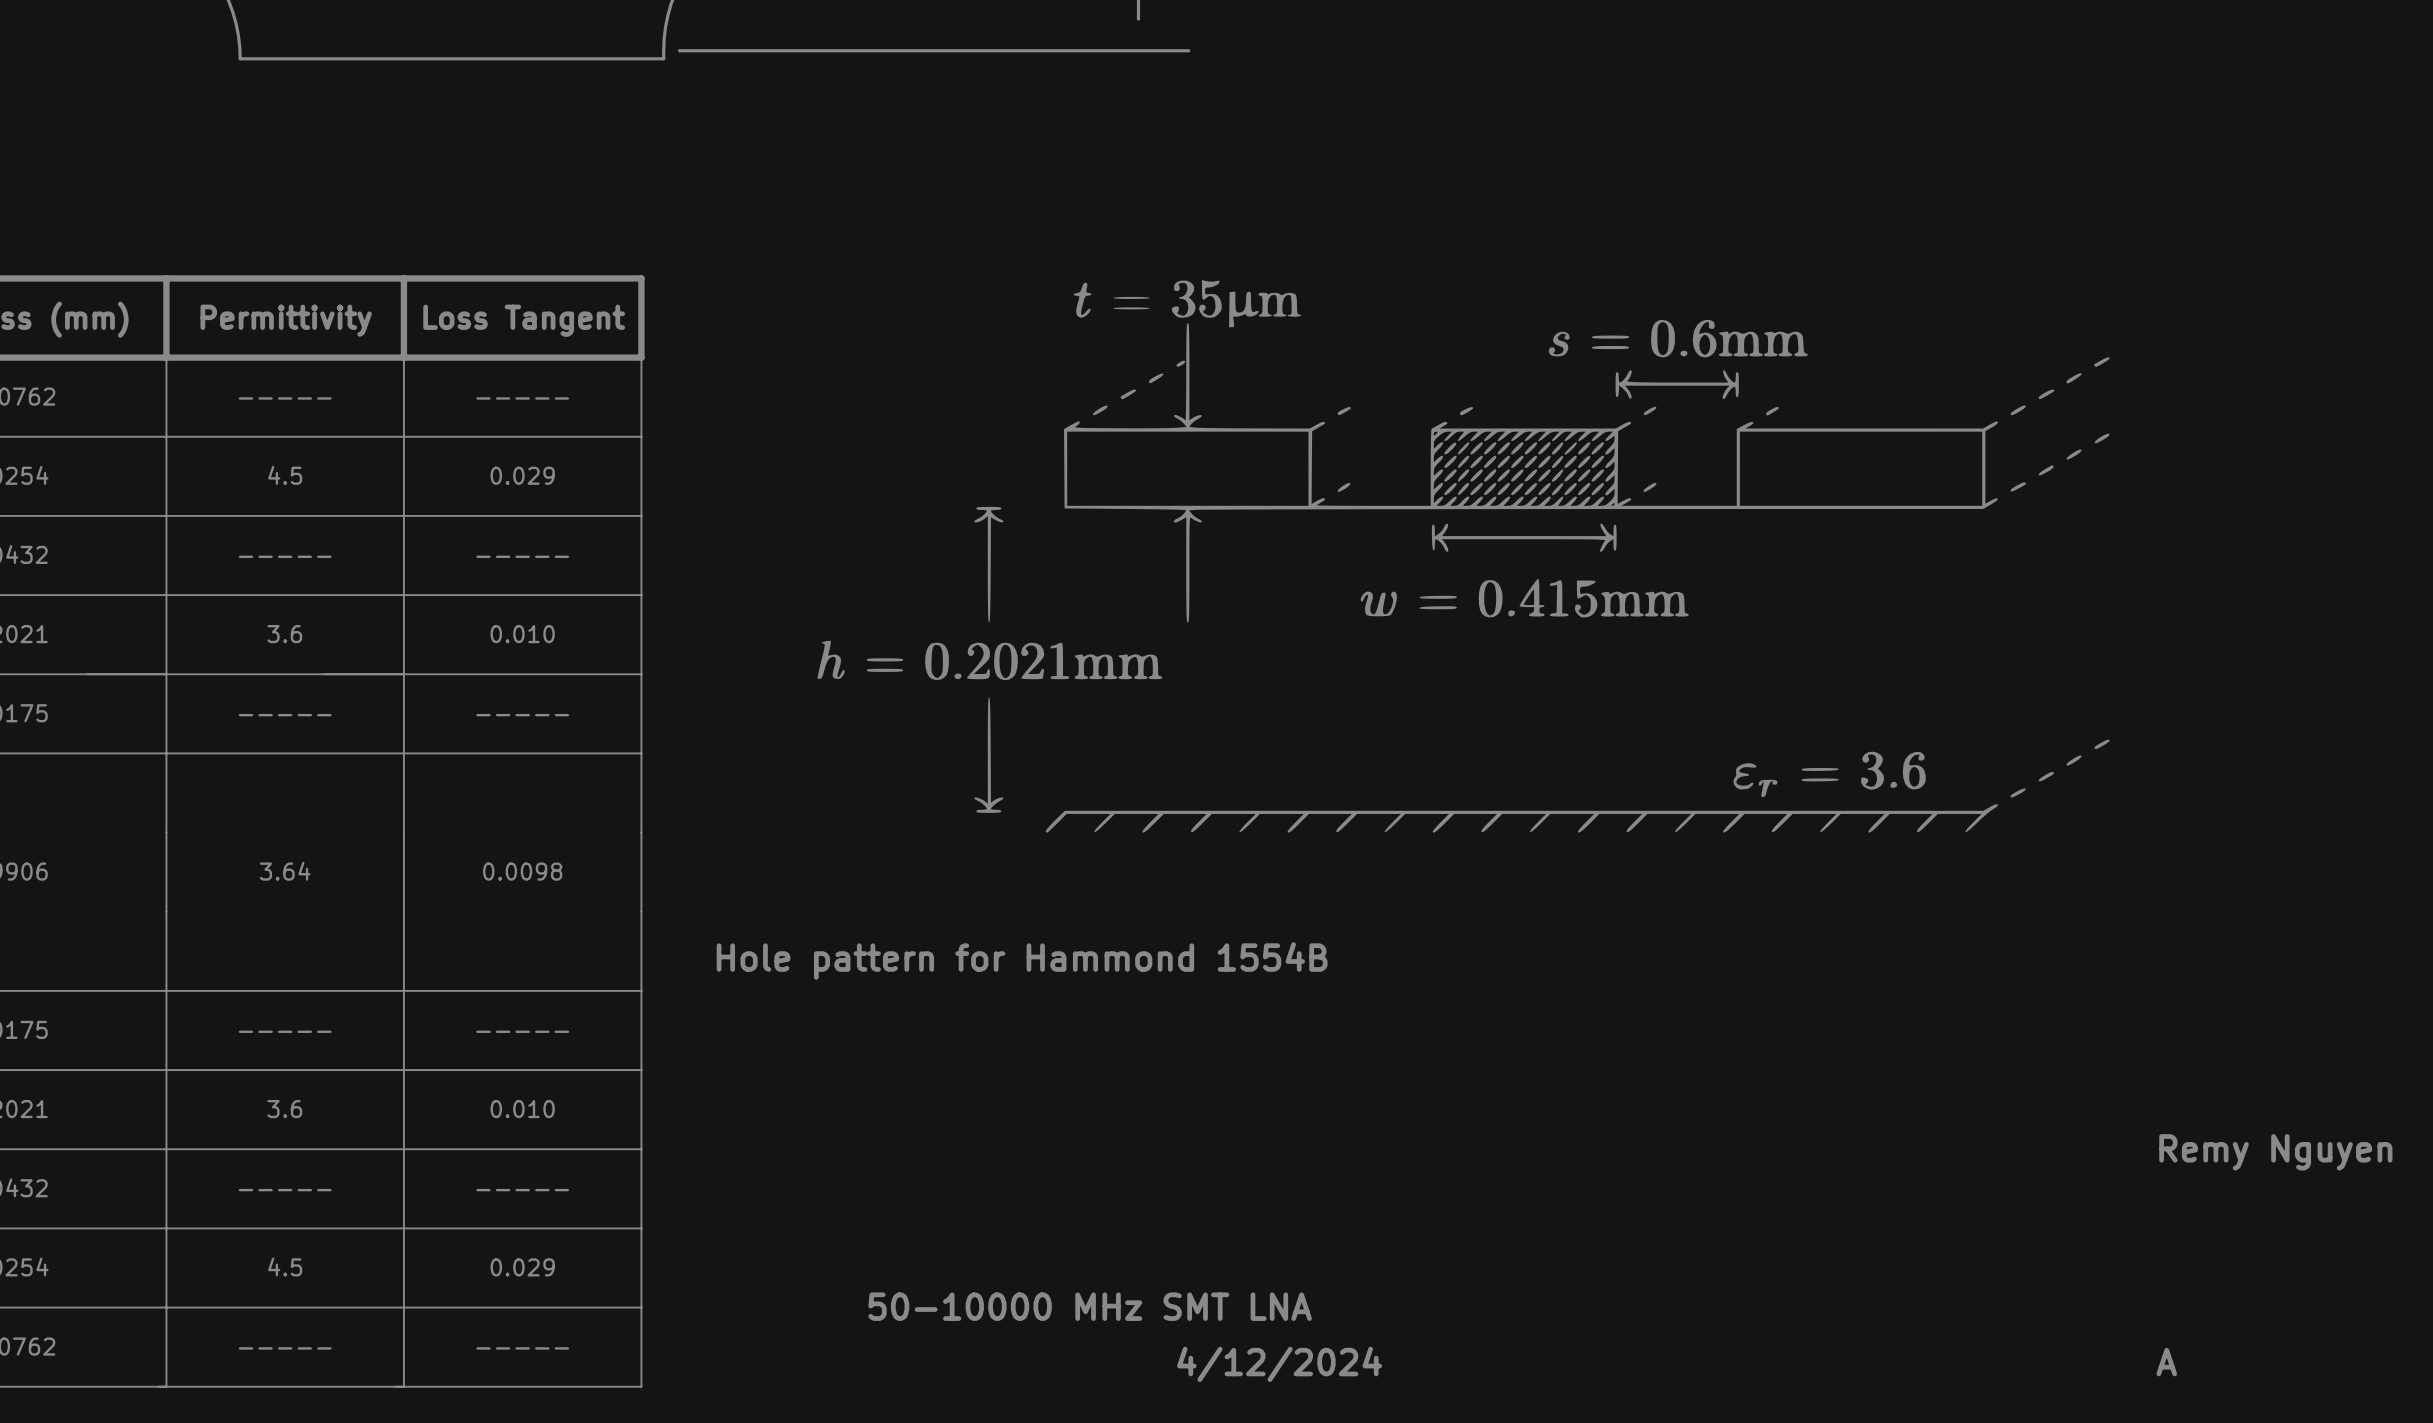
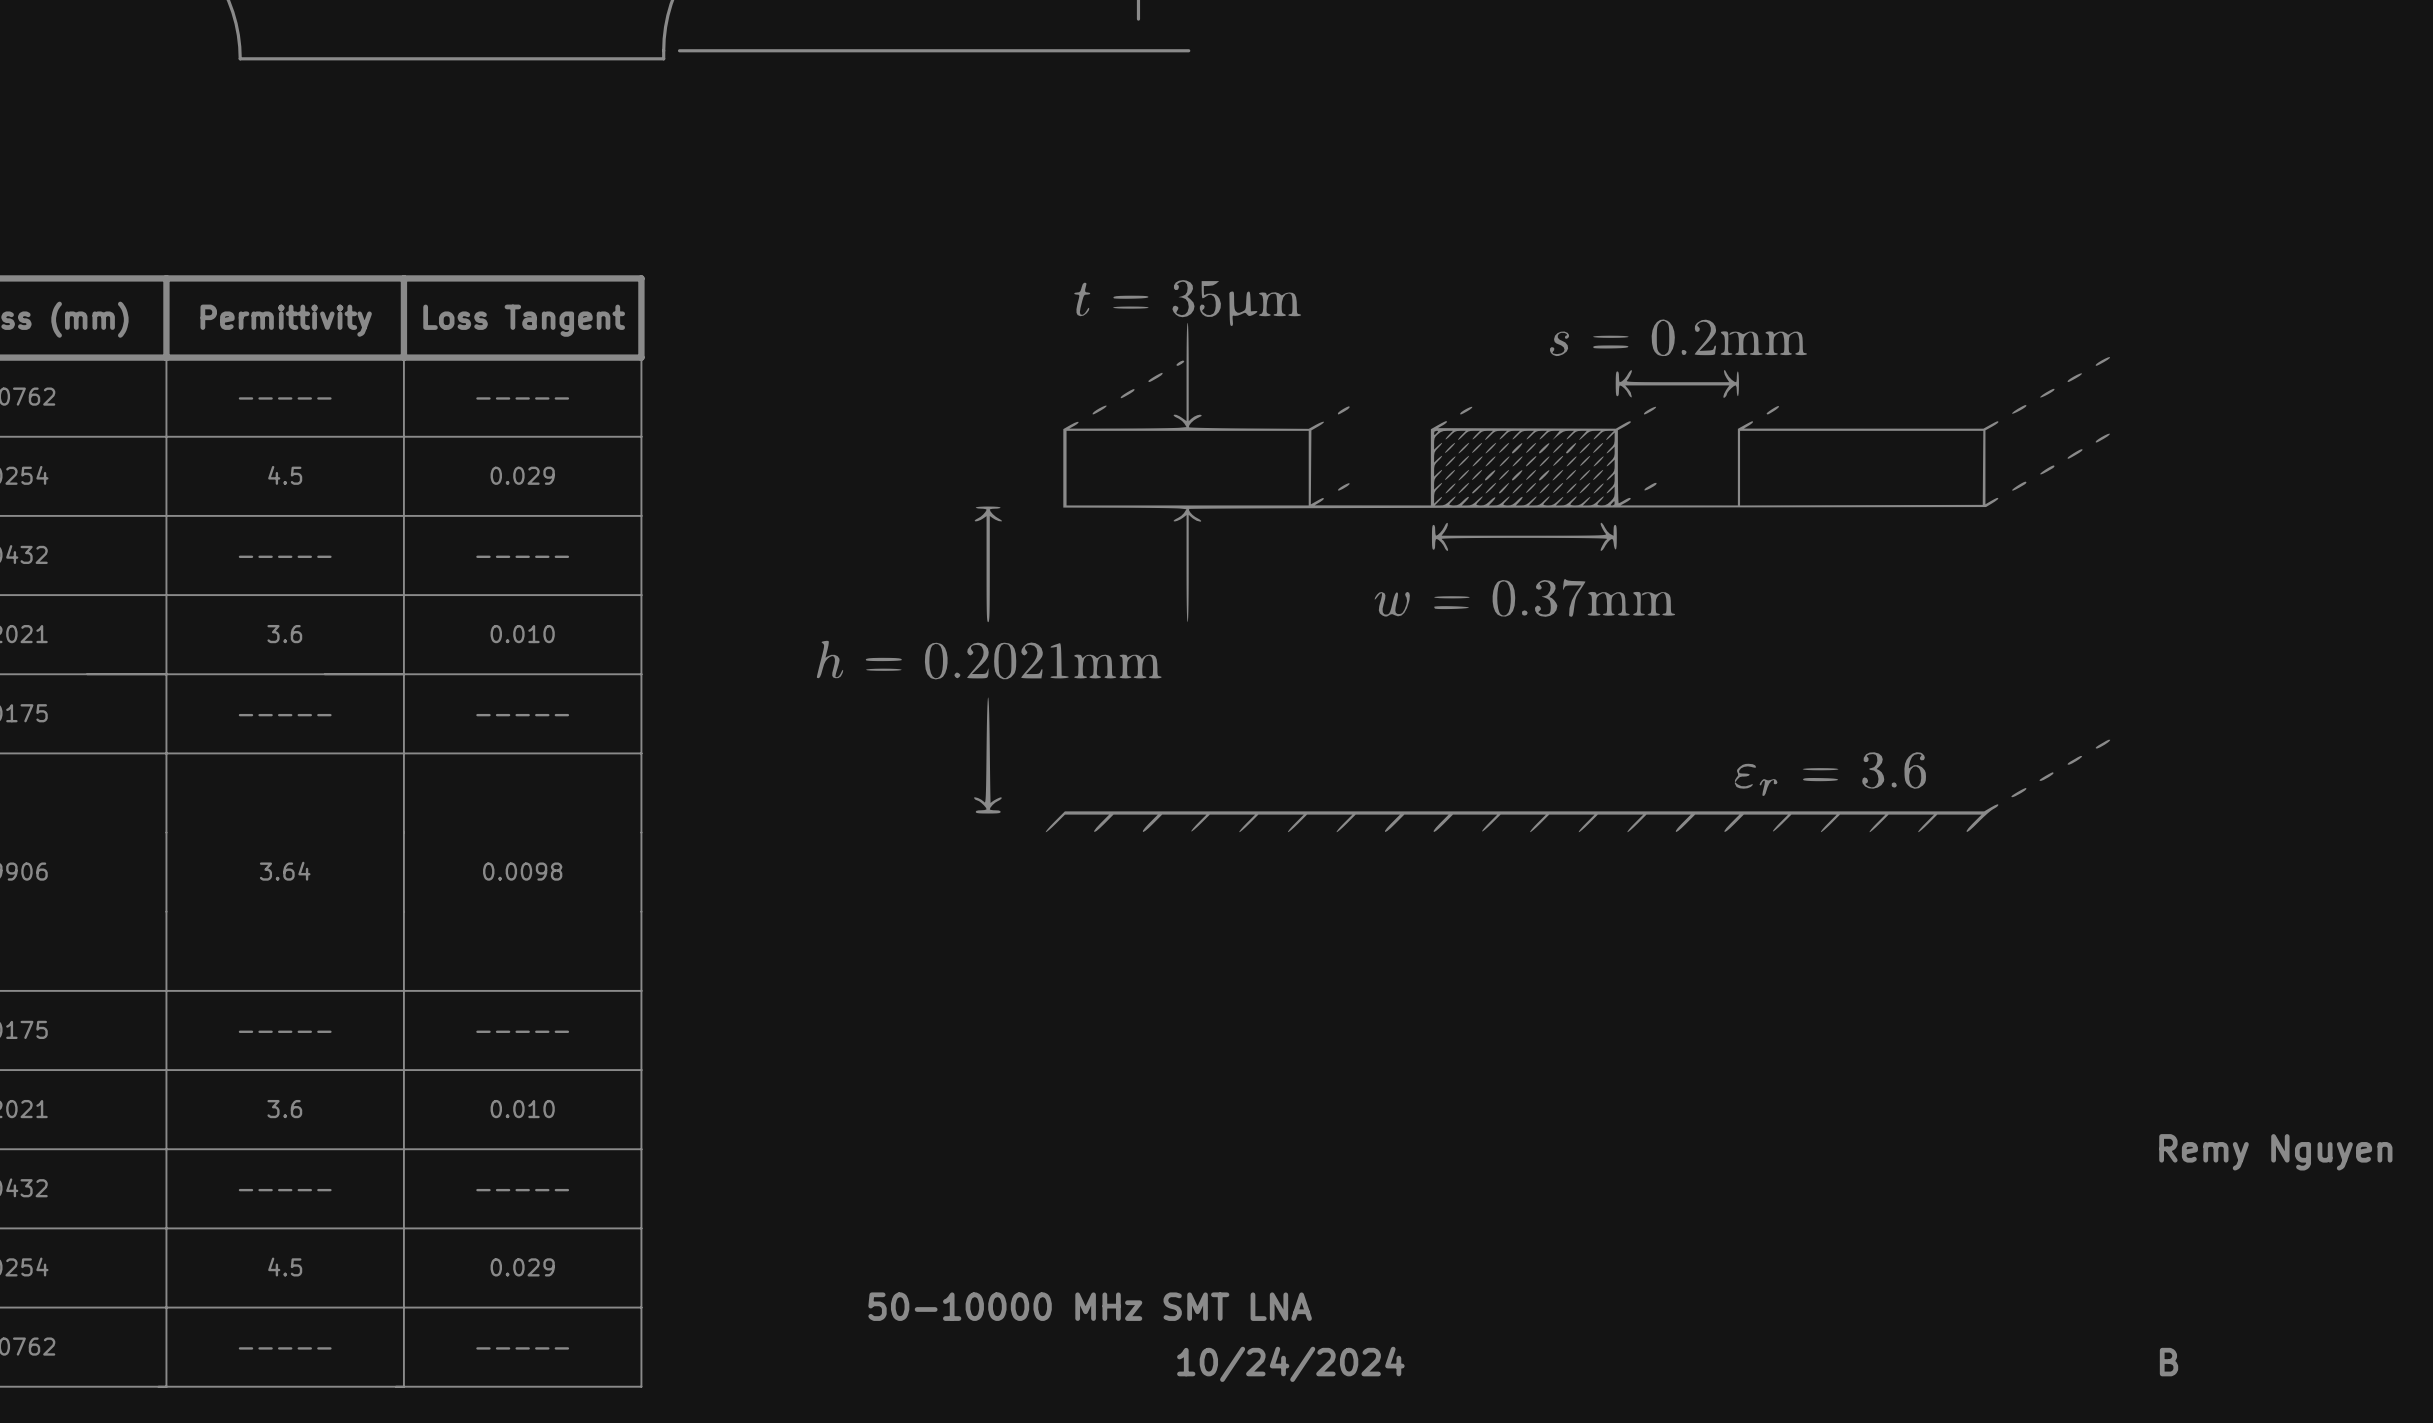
drawing shape: [817, 279, 2110, 833] -> [816, 280, 2111, 833]
text: Hole pattern for Hammond 1554B (1022, 960) -> none
text: A (2166, 1362) -> B (2169, 1362)
text: 4/12/2024 (1279, 1364) -> 10/24/2024 (1290, 1364)

